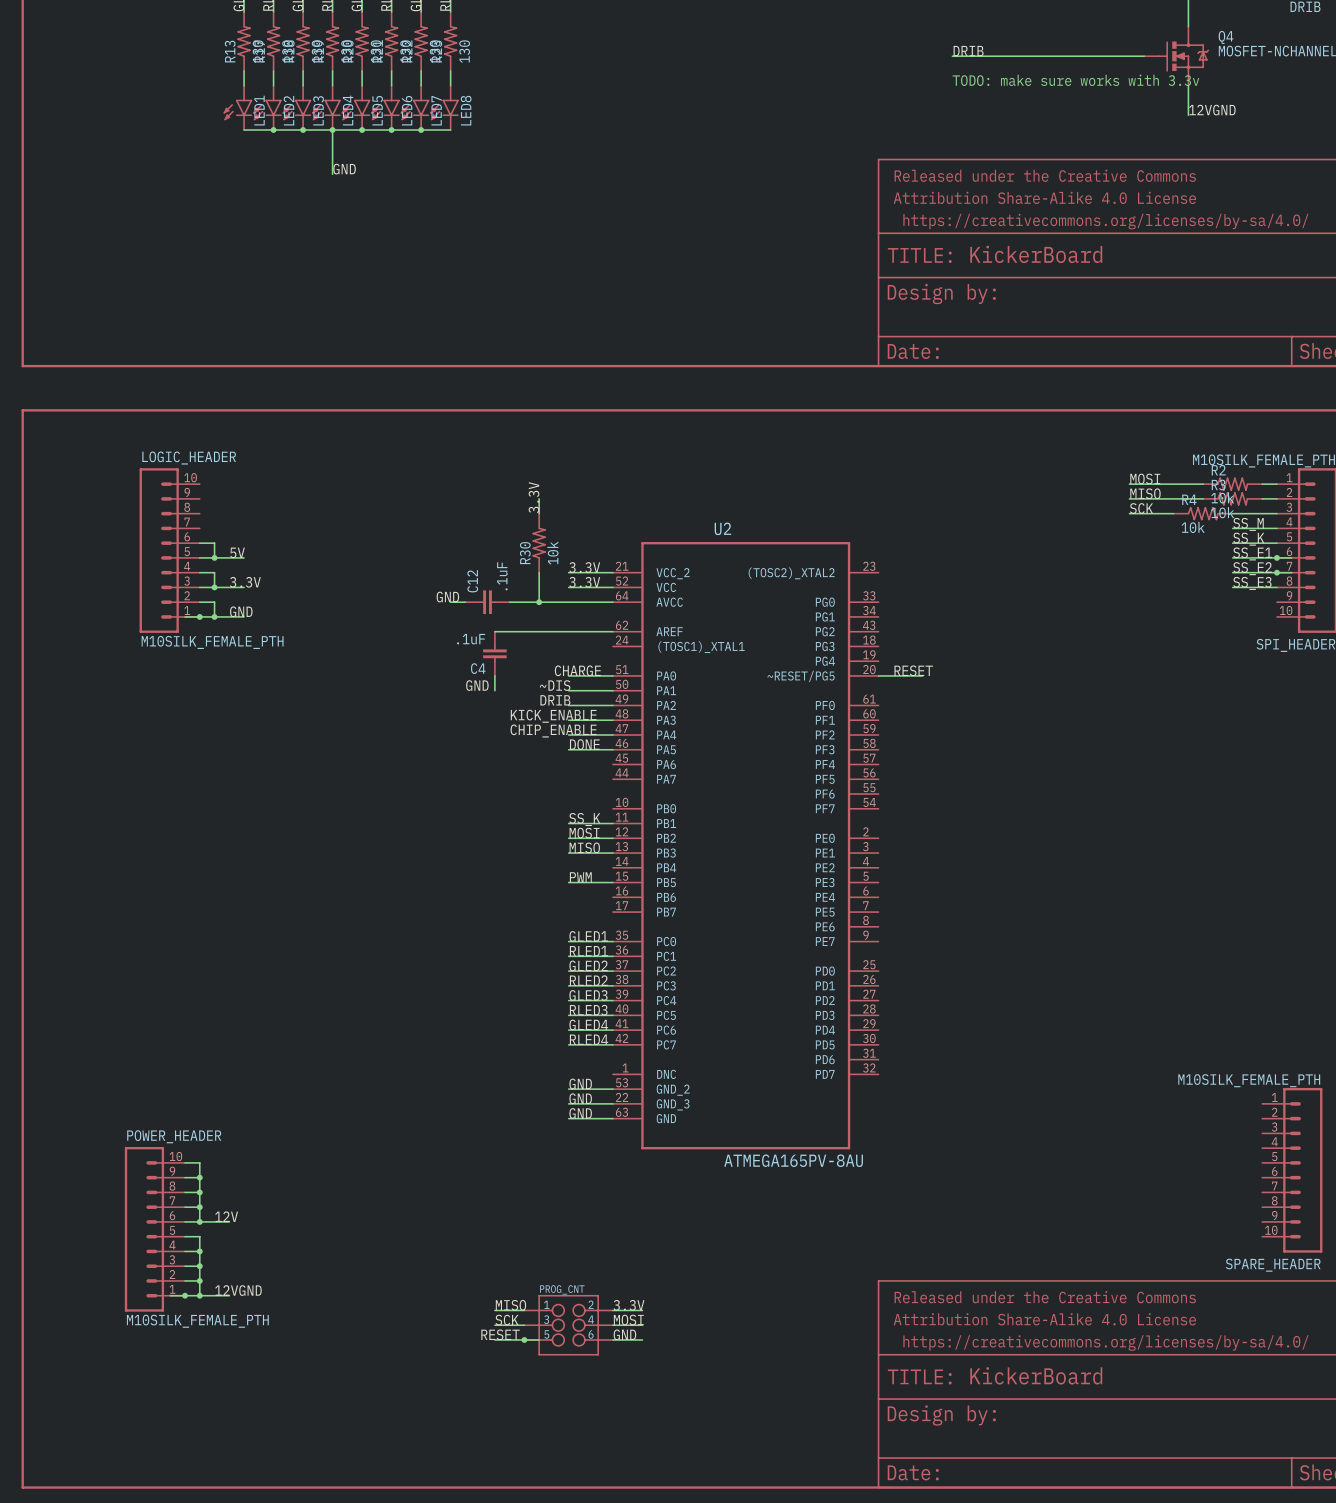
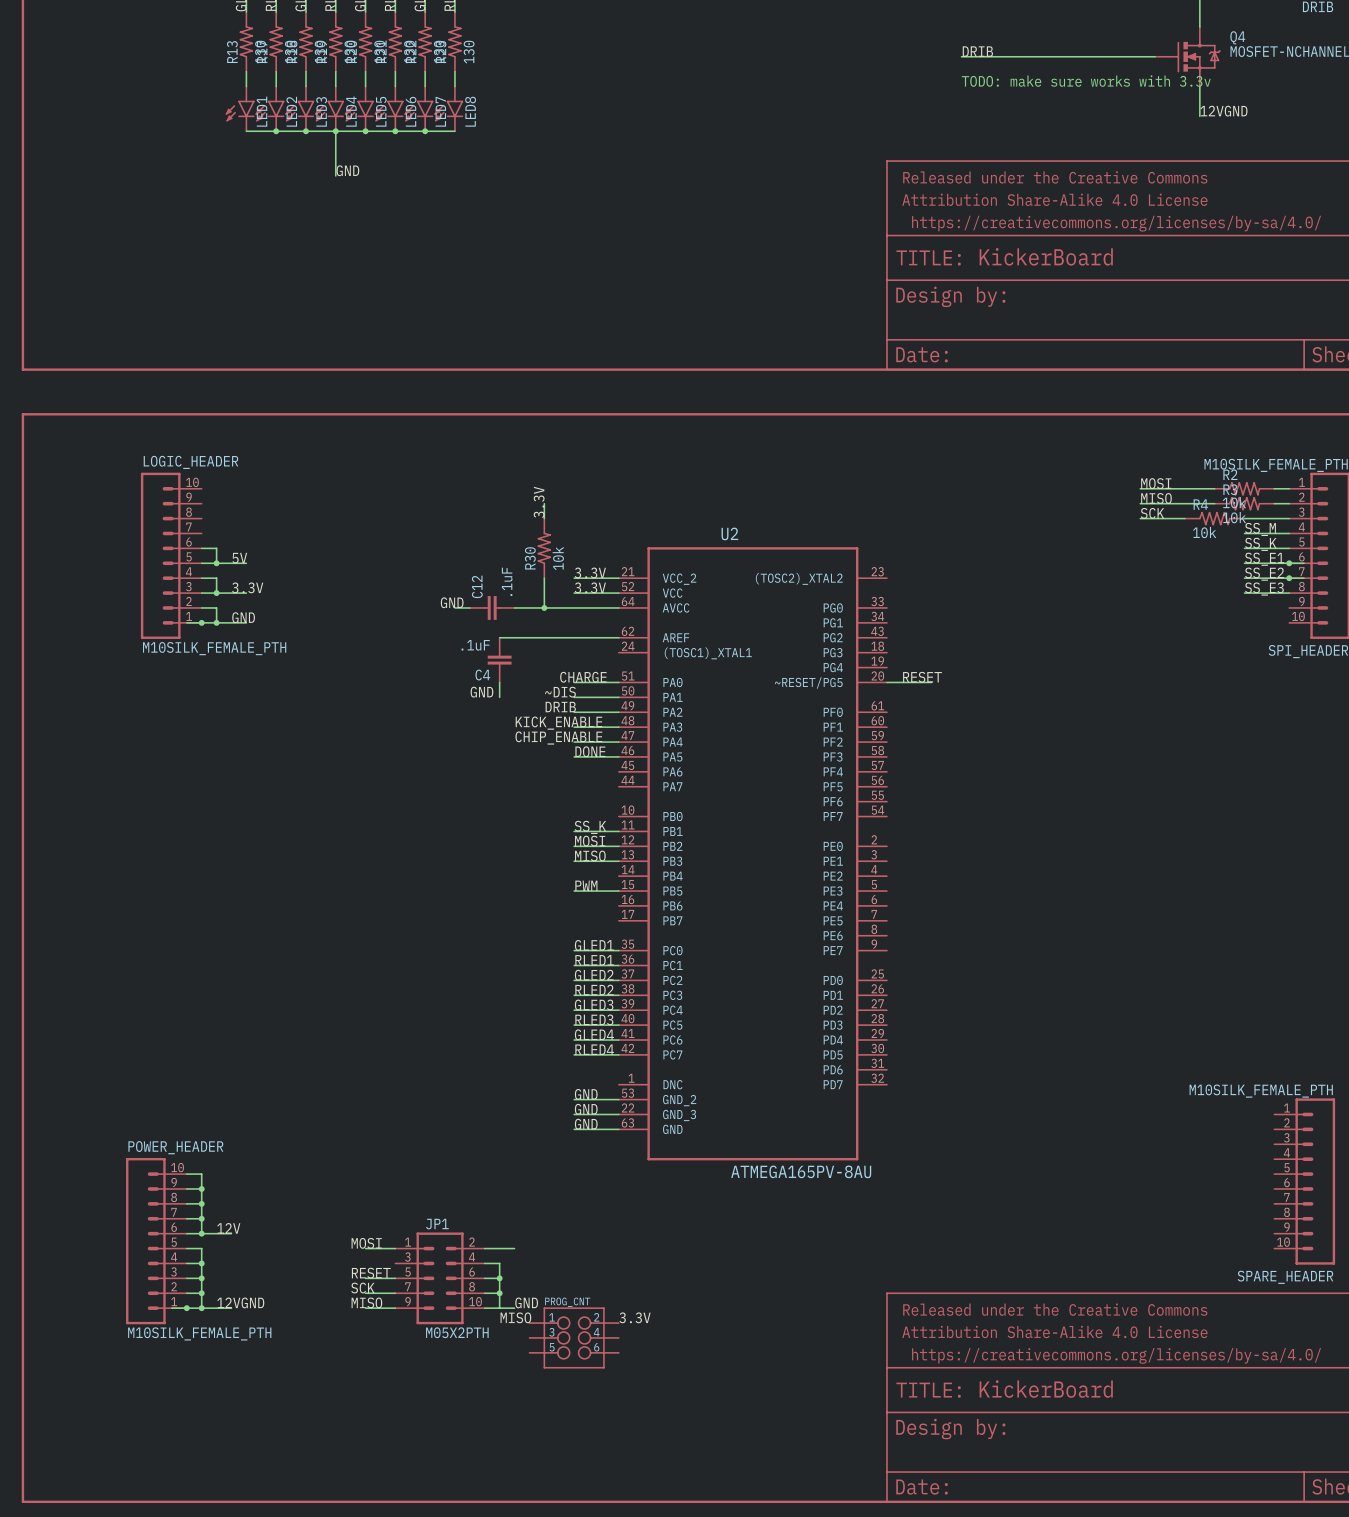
label: none -> MOSI (366, 1243)
wire: none -> (365, 1248) (395, 1248)
wire: none -> (484, 1248) (514, 1248)
wire: none -> (484, 1263) (499, 1263) (499, 1308)
label: none -> RESET (371, 1273)
wire: none -> (365, 1278) (395, 1278)
JP1: none -> M05X2PTH (440, 1278)
wire: none -> (484, 1278) (499, 1278)
junction: none -> (499, 1278)
label: none -> SCK (362, 1288)
wire: none -> (484, 1293) (499, 1293)
junction: none -> (499, 1293)
label: none -> MISO (366, 1302)
wire: (494, 1310) (524, 1310) -> (365, 1293) (395, 1293)
wire: (612, 1310) (642, 1310) -> none
label: SCK (507, 1320) -> none
label: MOSI (628, 1320) -> none
wire: (494, 1325) (524, 1325) -> (365, 1308) (395, 1308)
wire: (612, 1325) (642, 1325) -> (484, 1308) (514, 1308)
label: RESET (500, 1334) -> none
label position: GND (624, 1334) -> GND (526, 1302)
wire: (494, 1339) (539, 1339) -> none
junction: (524, 1339) -> none
wire: (612, 1339) (642, 1339) -> none

